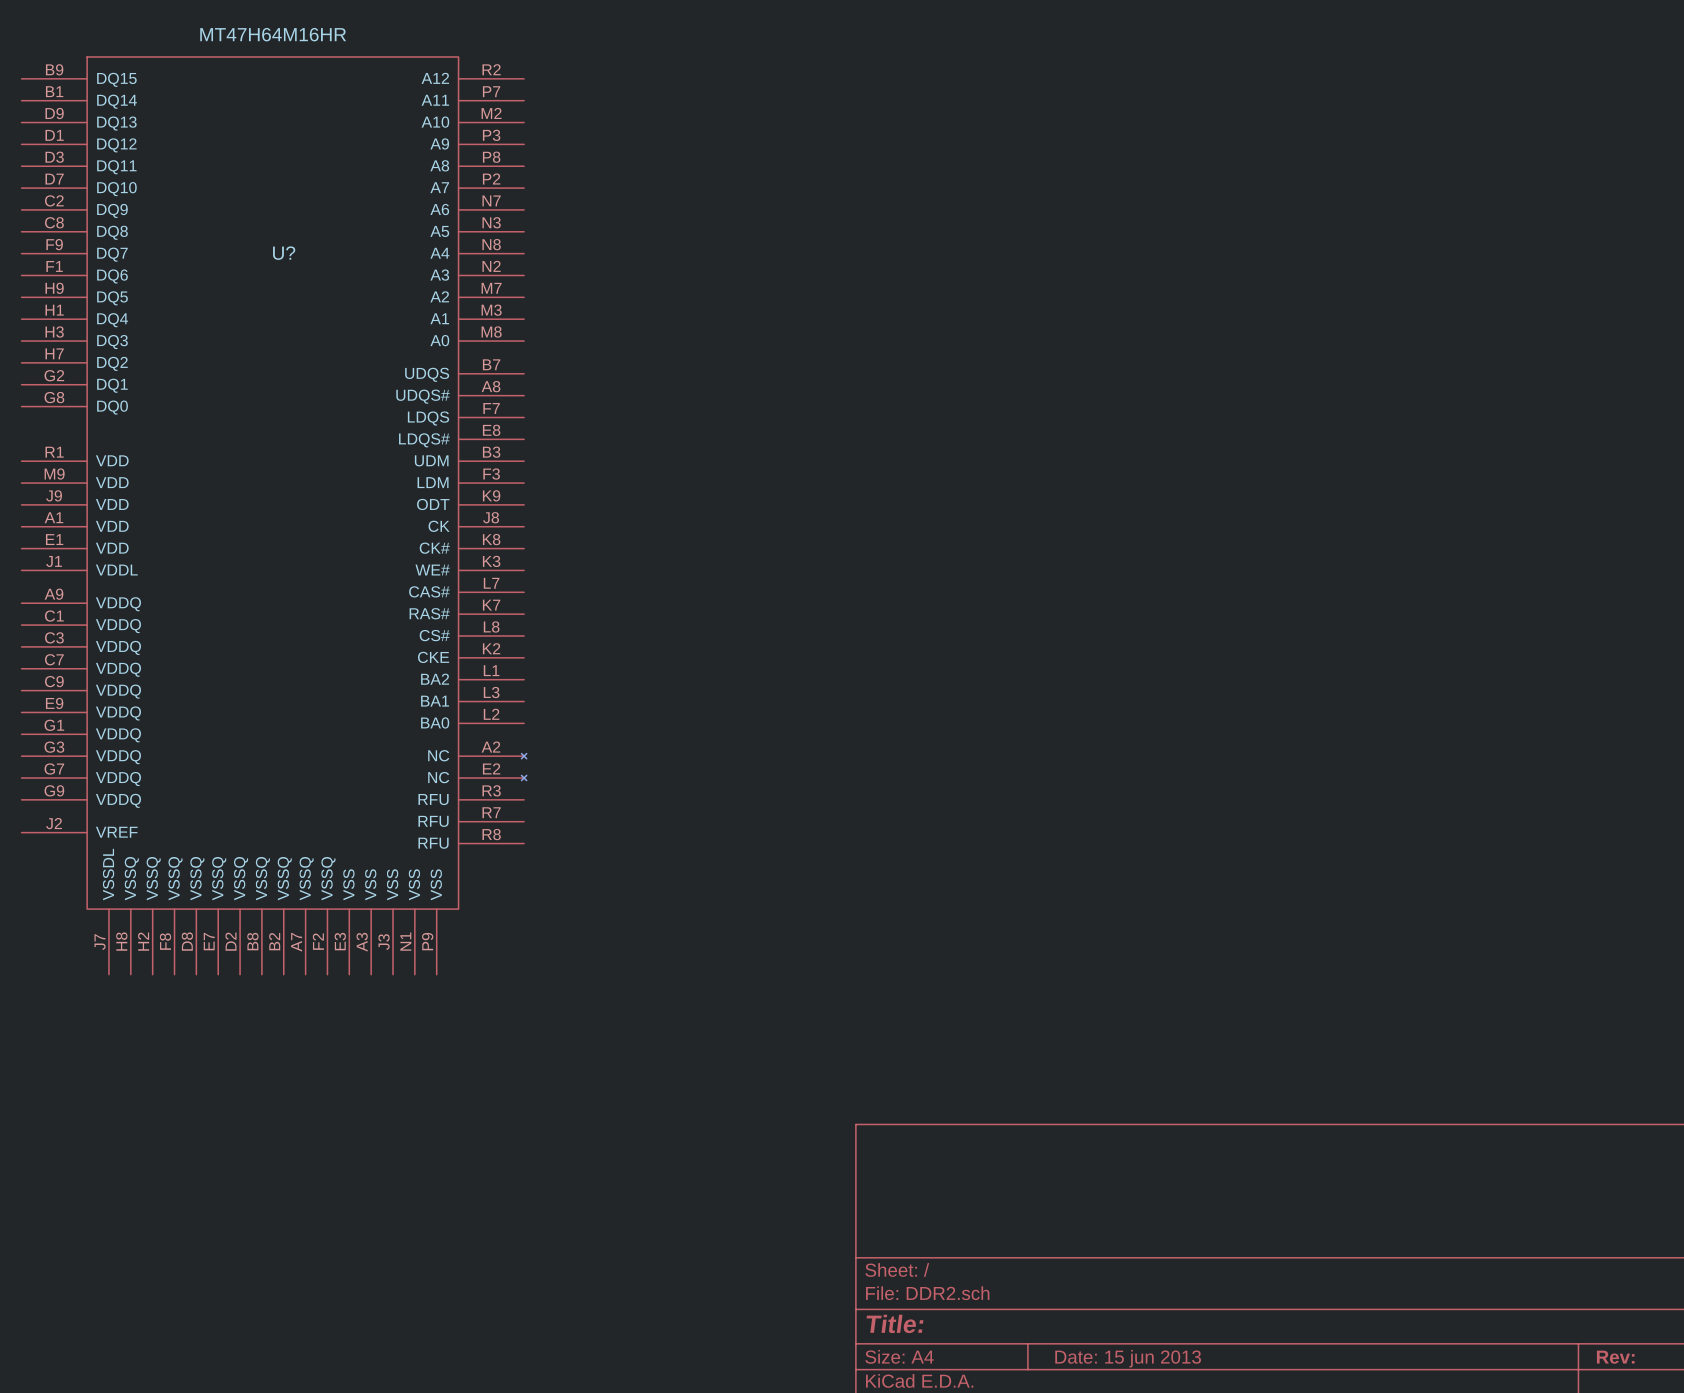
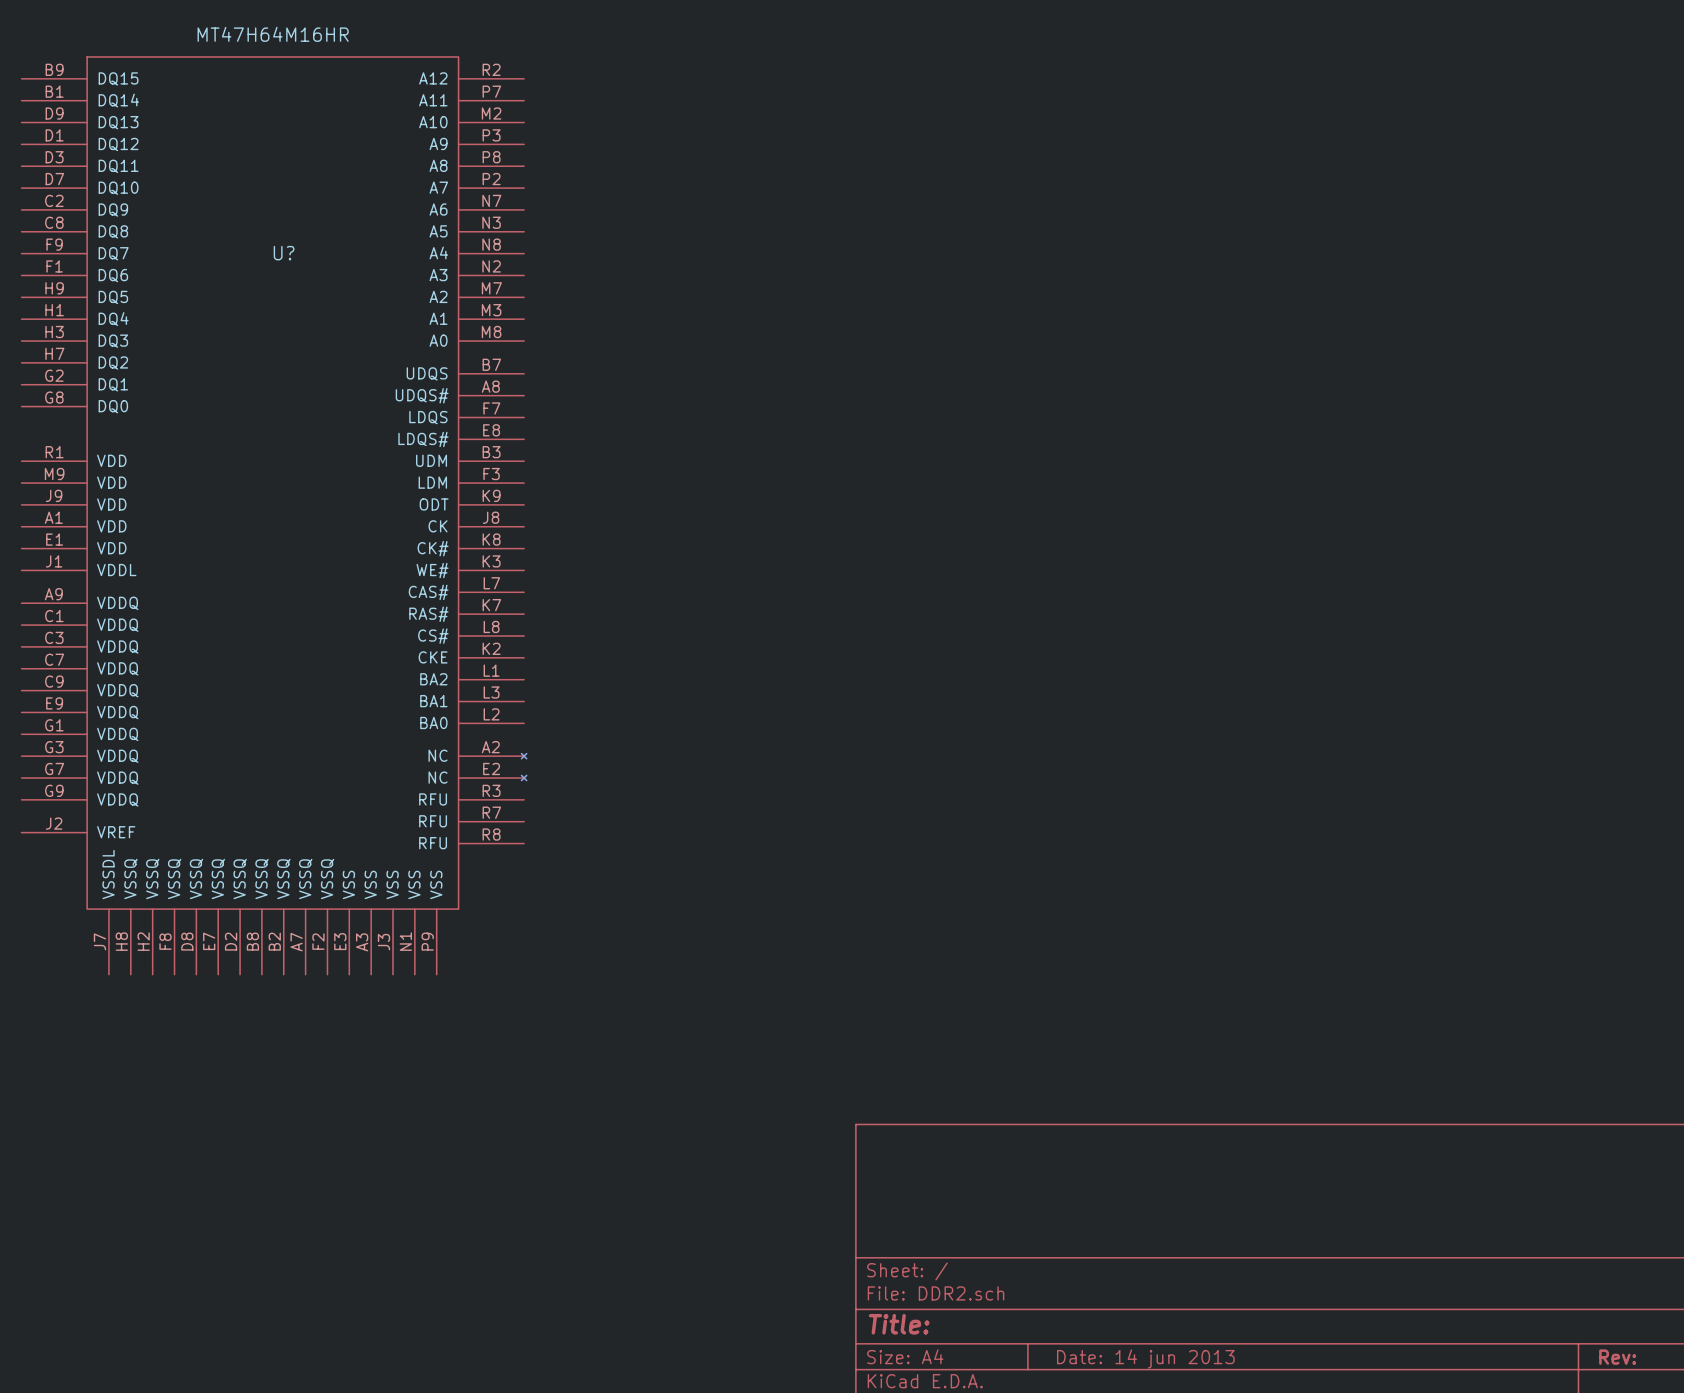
title block: Date: 15 jun 2013 (1128, 1358) -> Date: 14 jun 2013 (1145, 1358)

